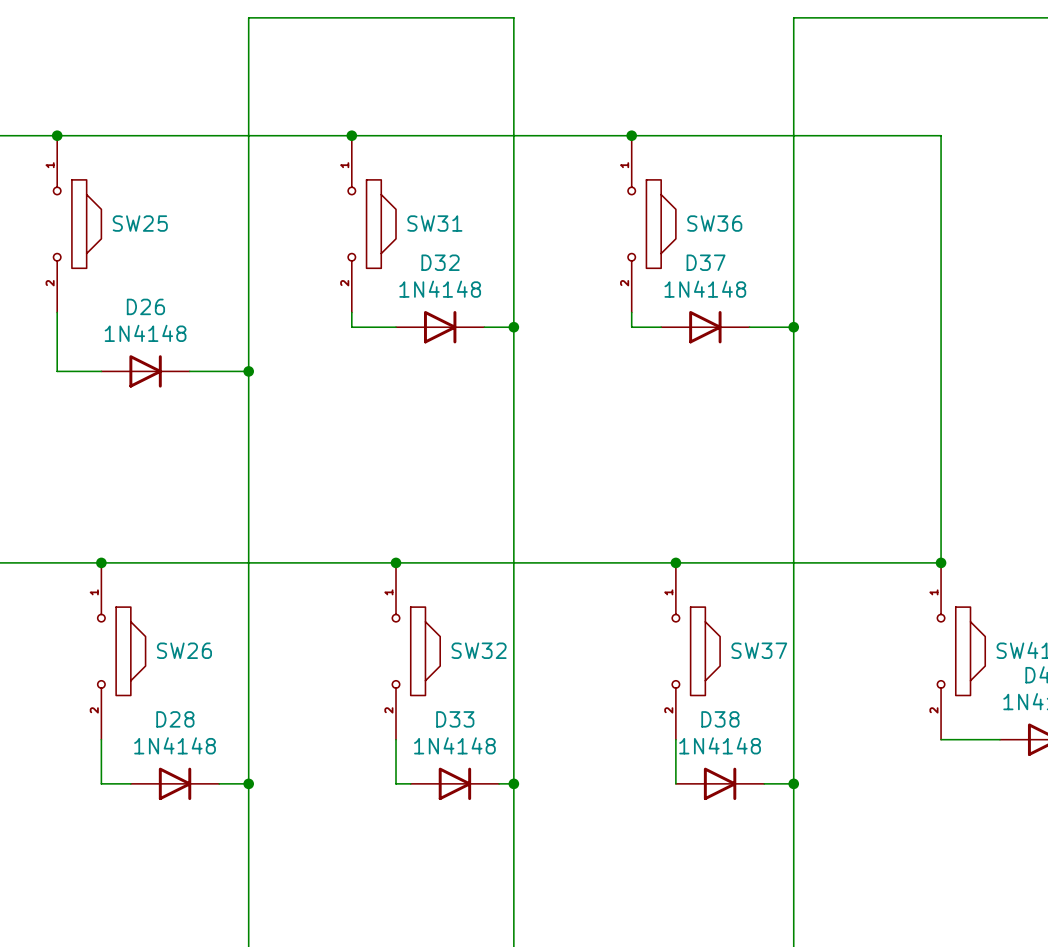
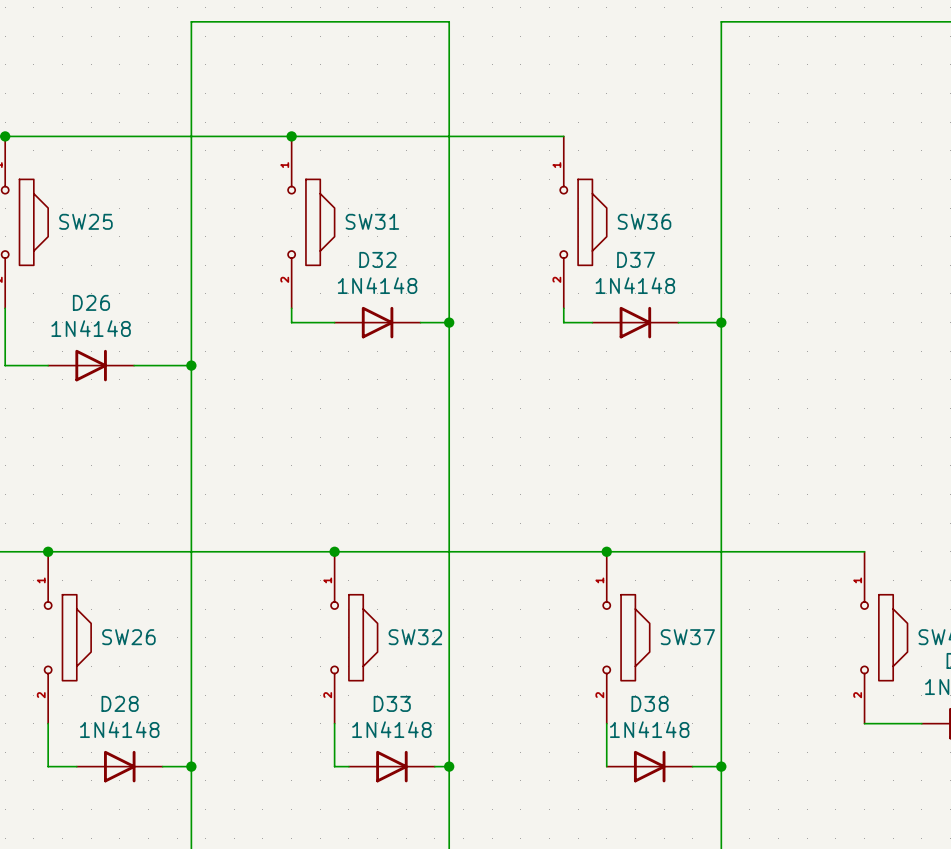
wire: (631, 135) (941, 135) (941, 562) -> none
junction: (631, 135) -> none
junction: (941, 562) -> none

